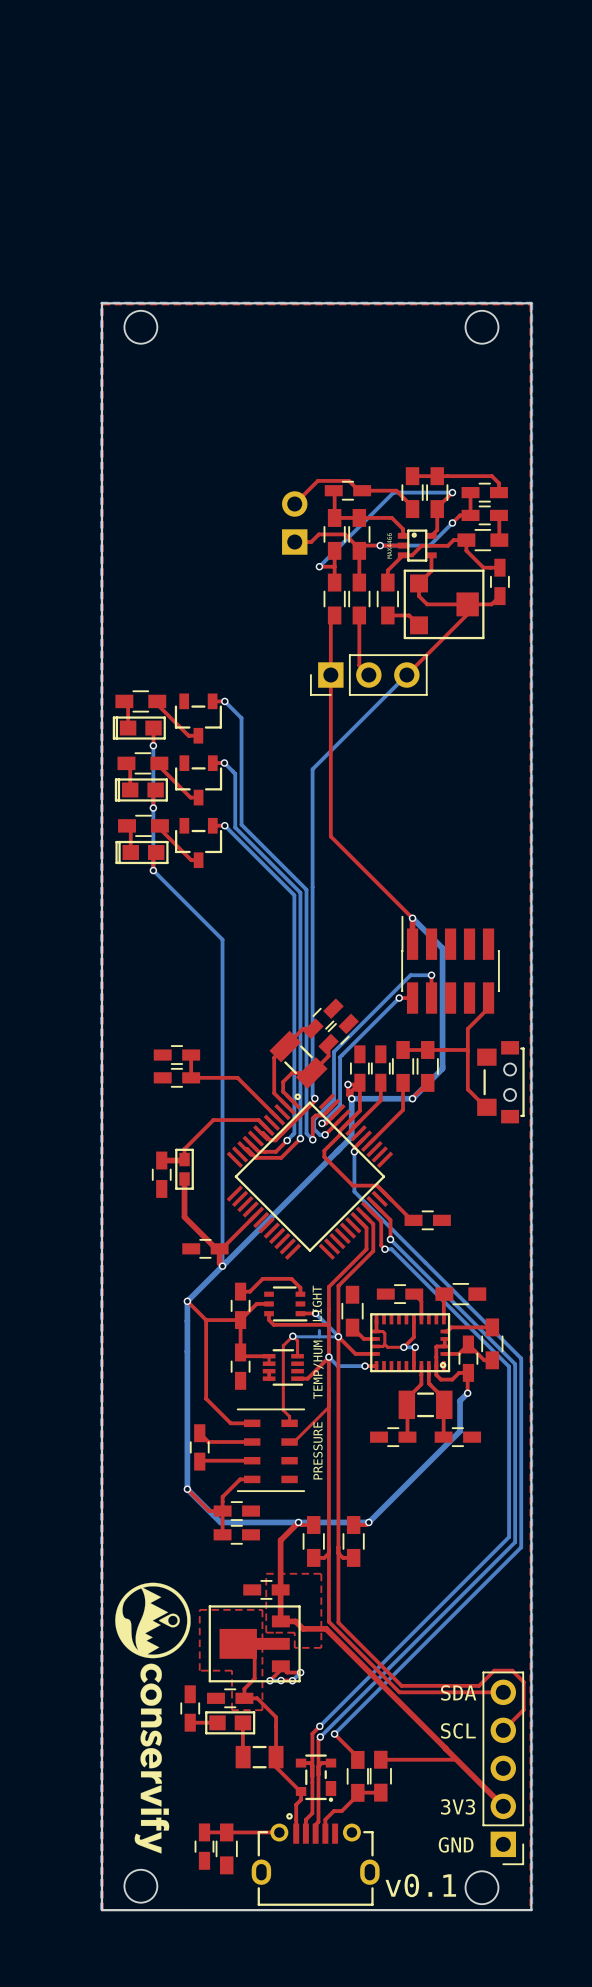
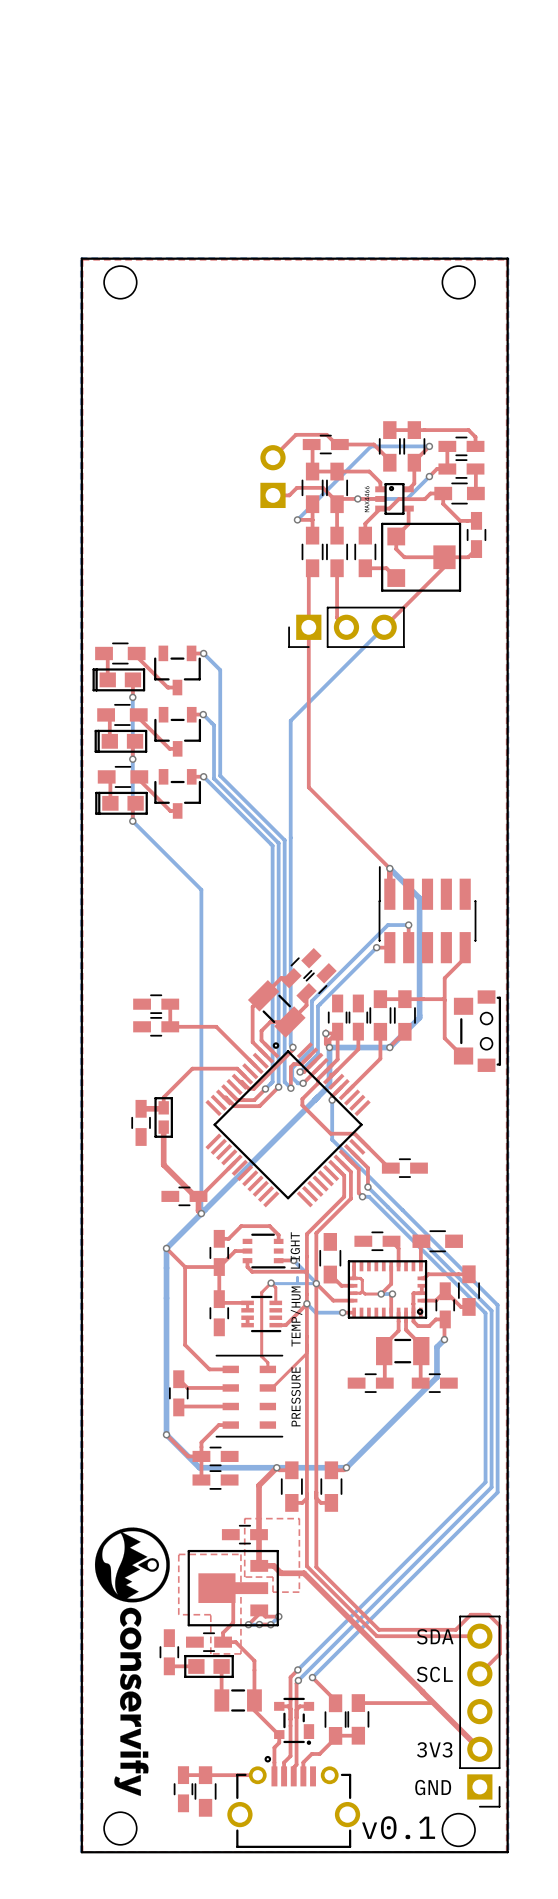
part footprint: [251, 1813, 380, 1906] -> [227, 1755, 361, 1848]

